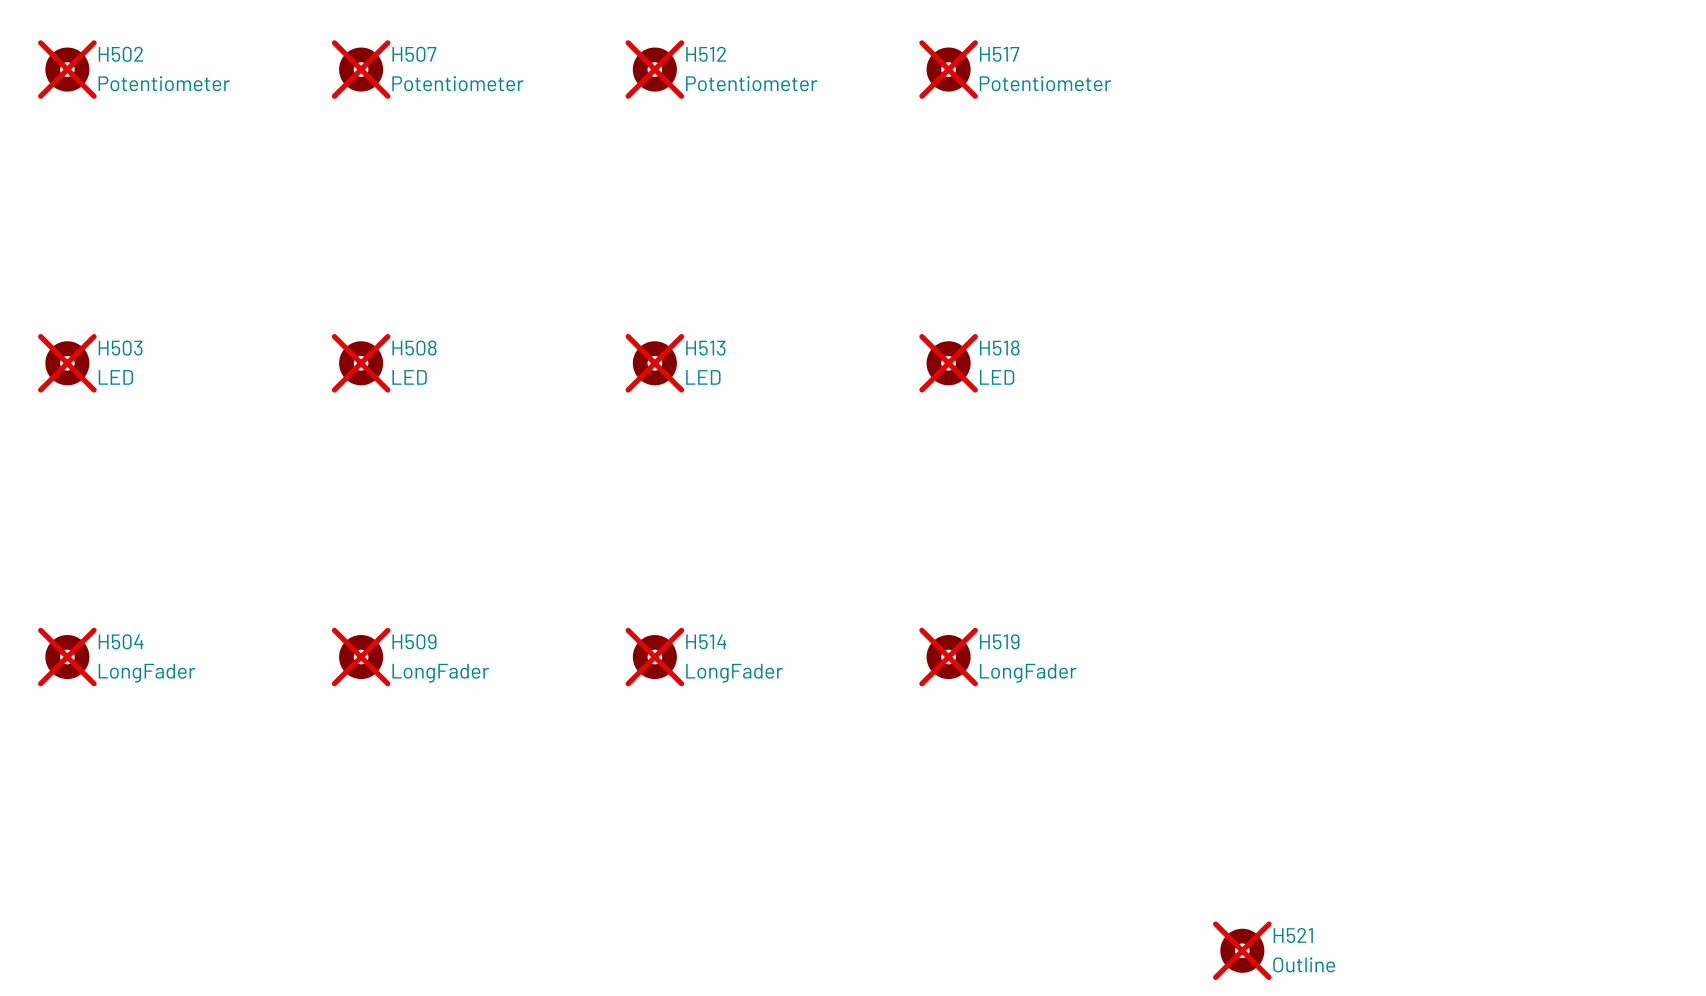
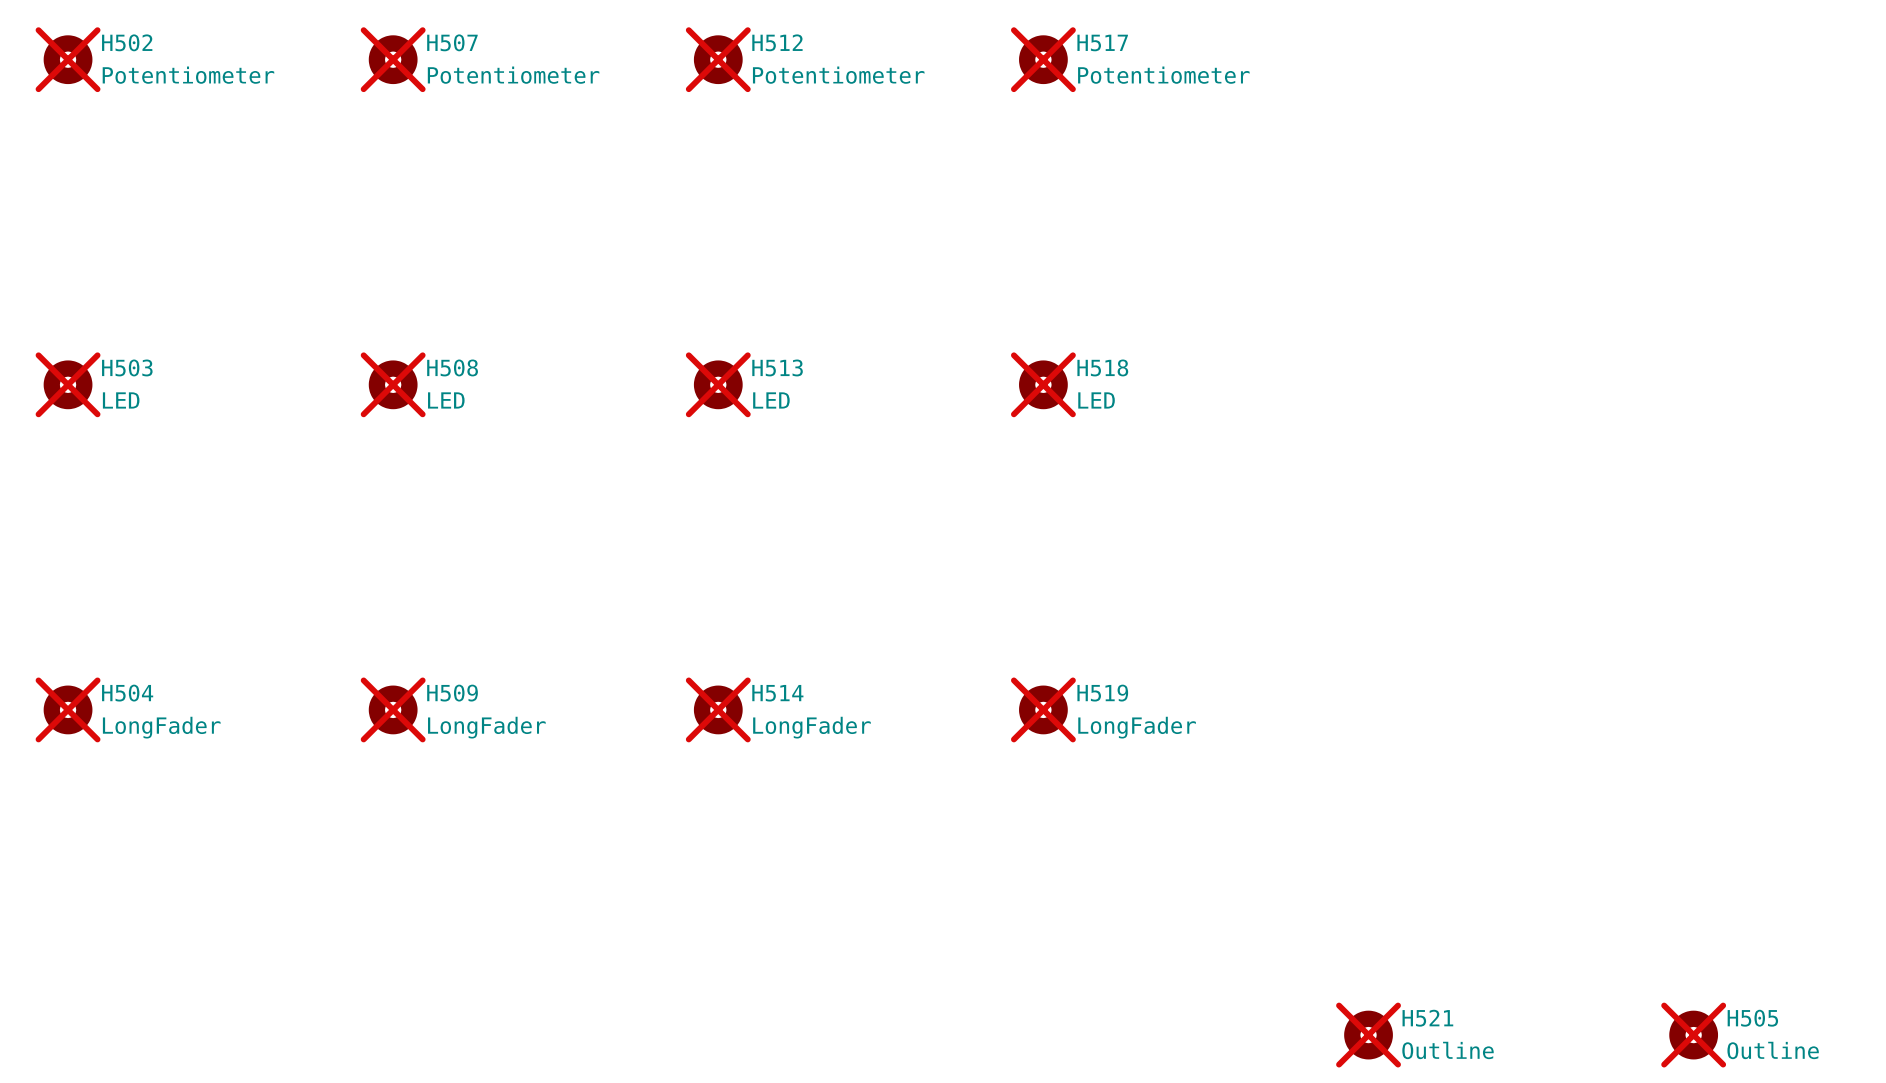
H505: none -> Outline (1693, 1035)

